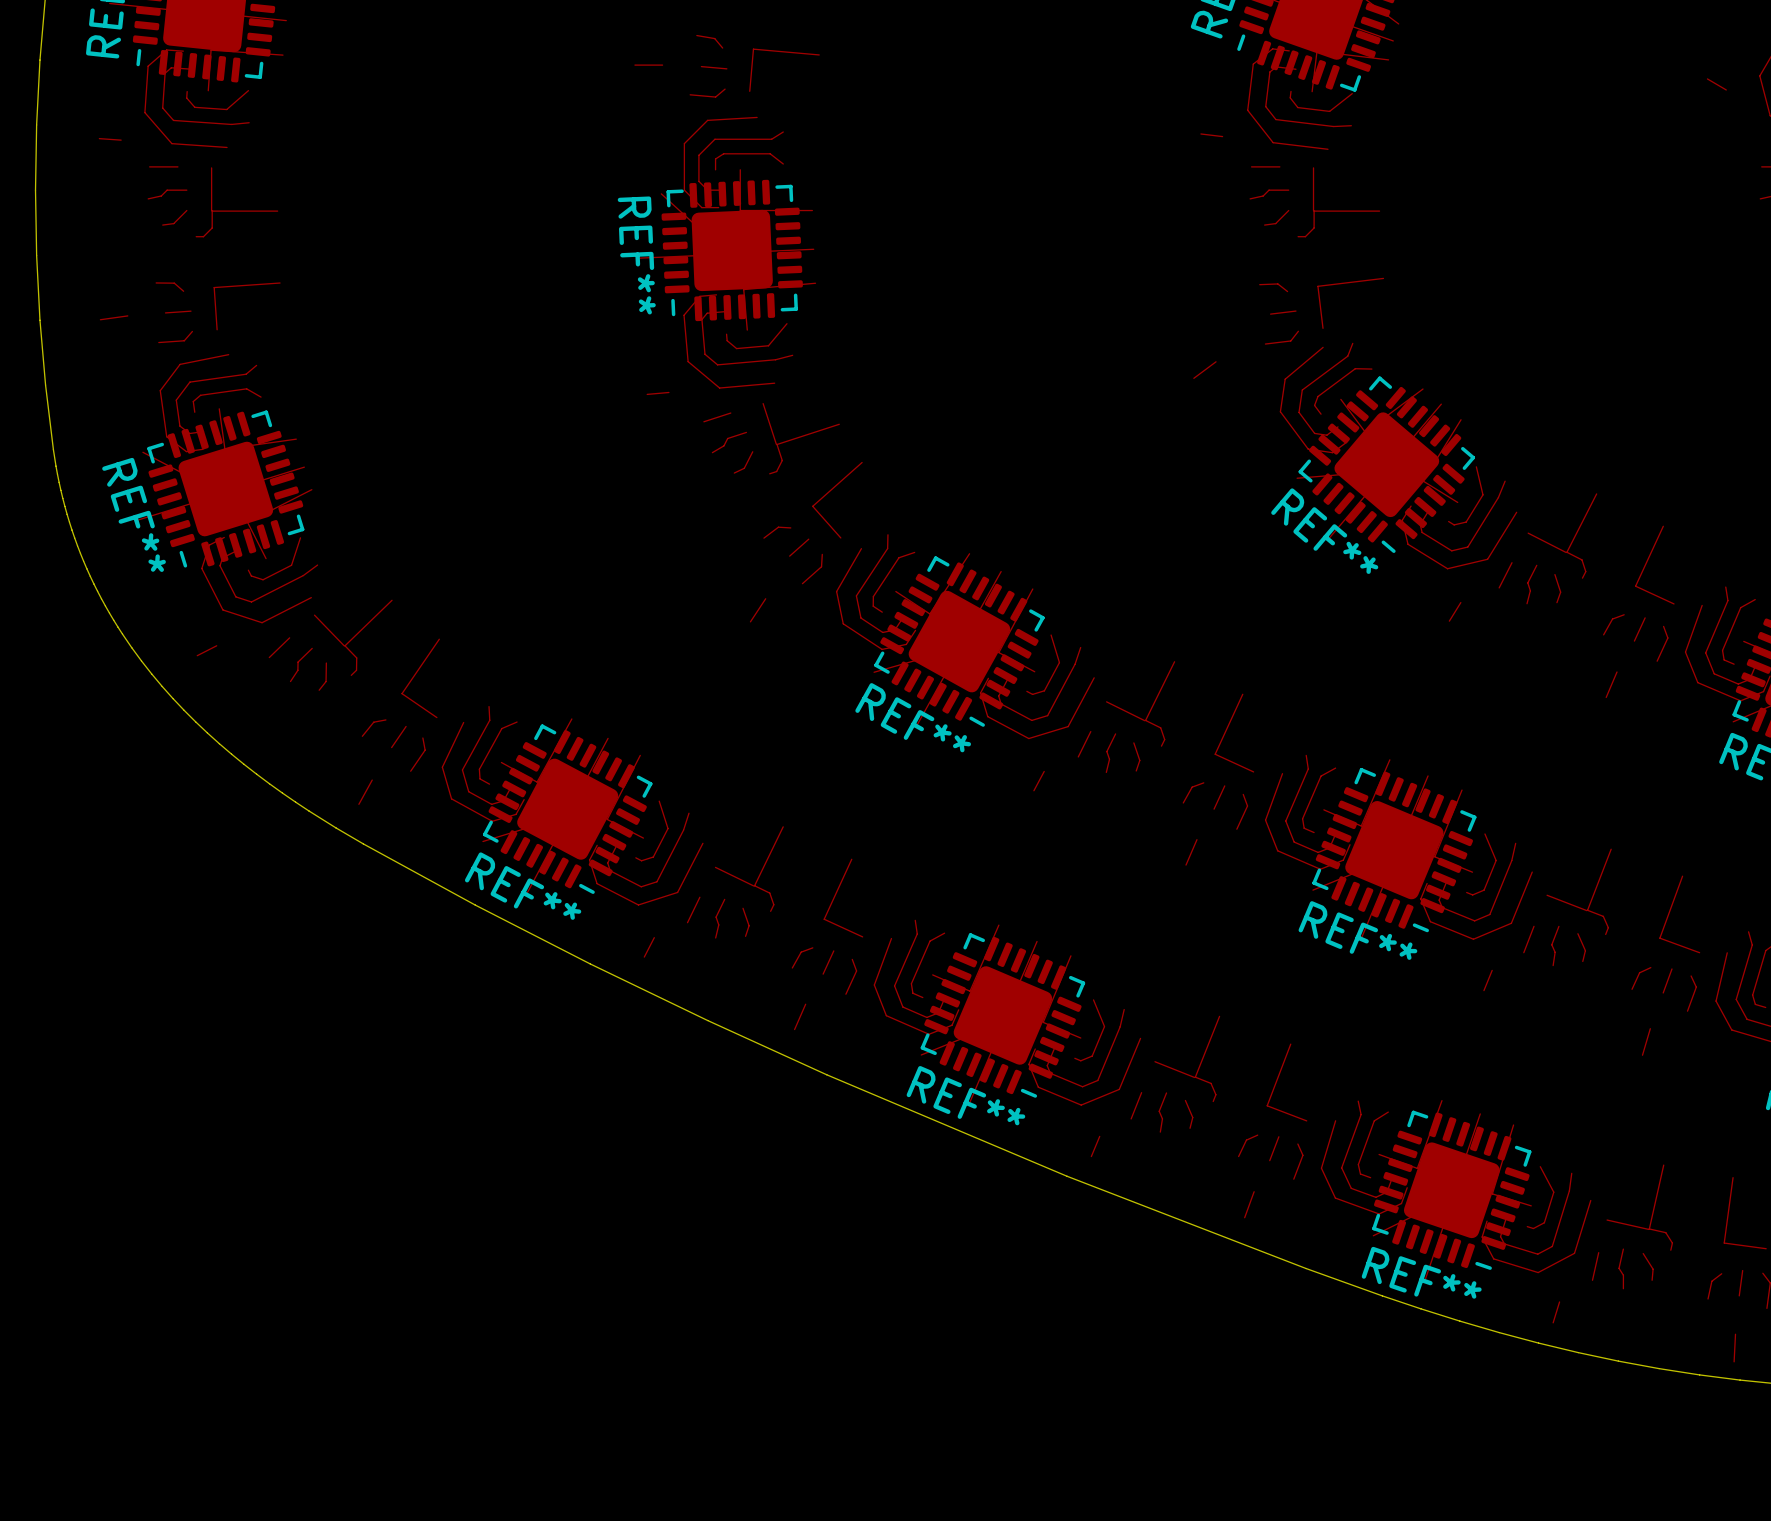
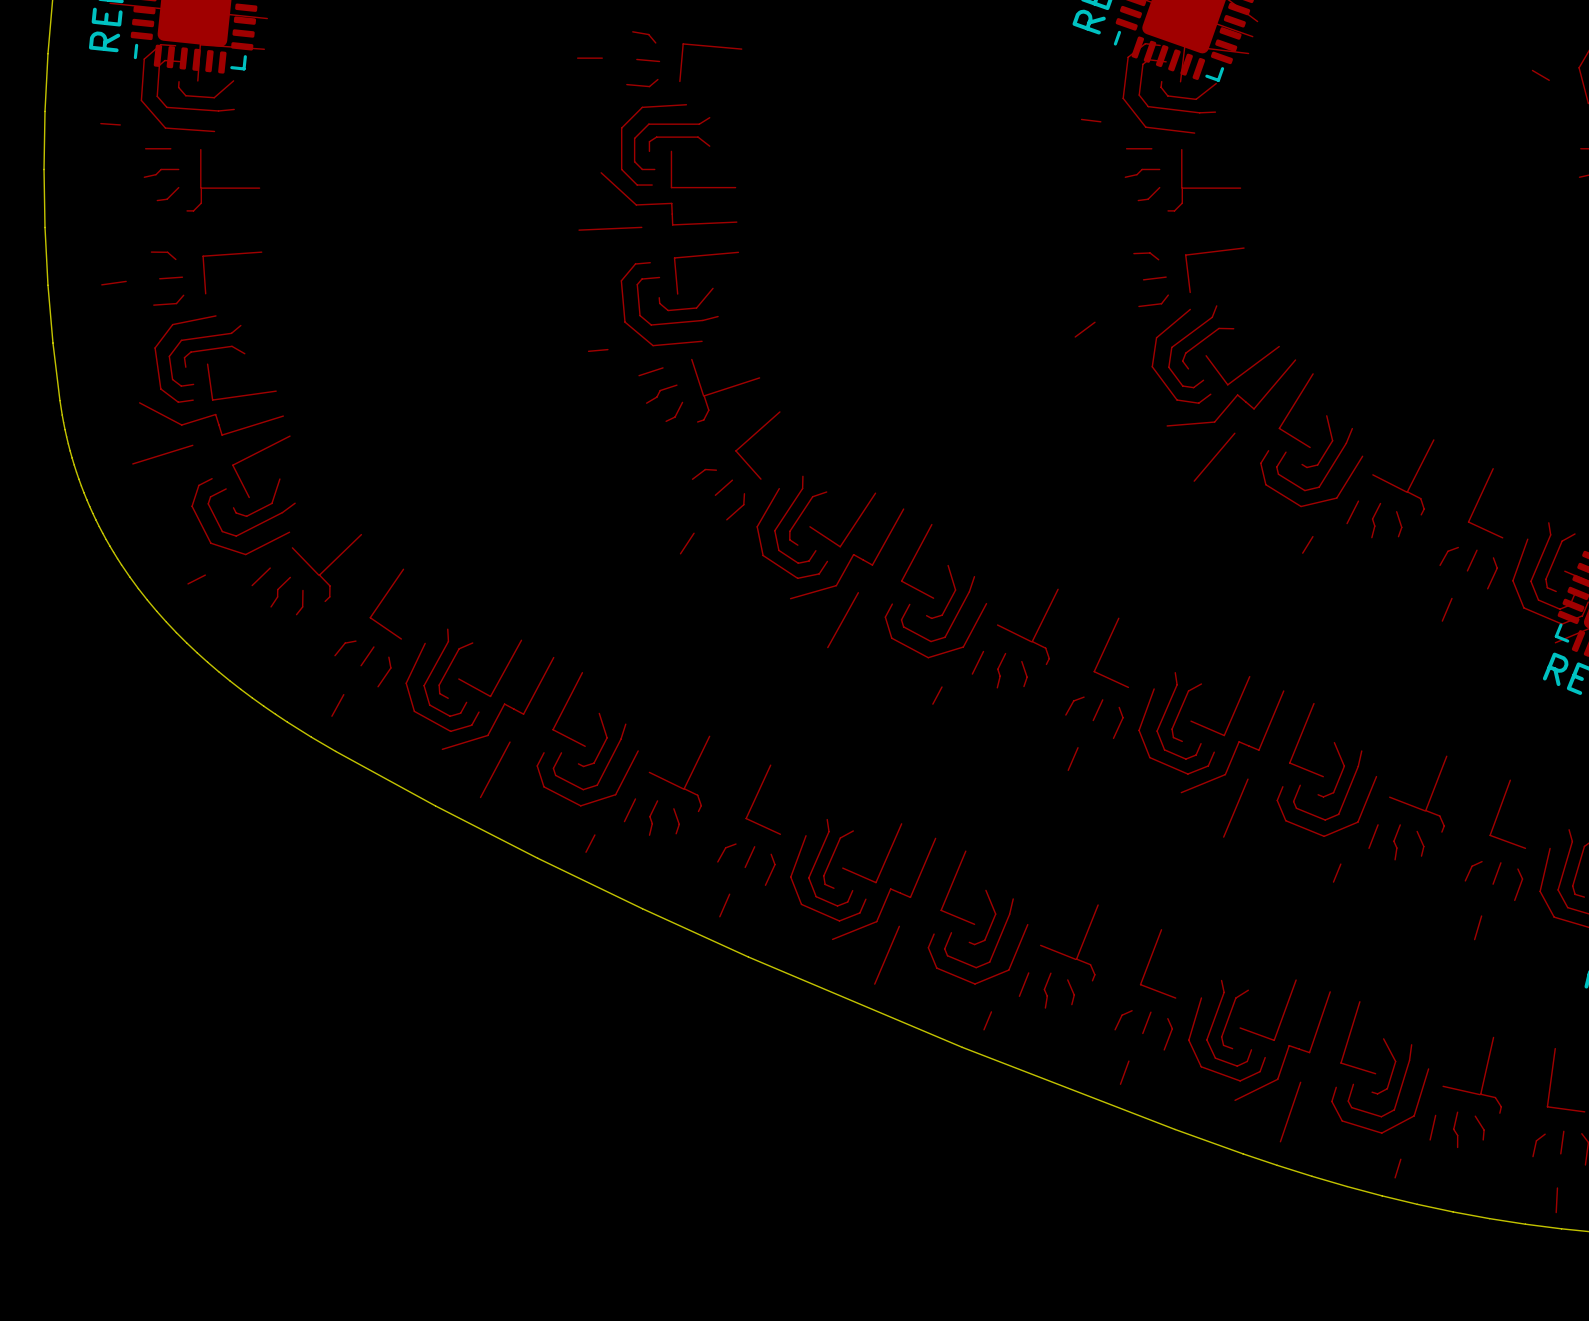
REF**: (732, 250) -> none
REF**: (1386, 464) -> none
REF**: (225, 489) -> none
REF**: (959, 641) -> none
REF**: (567, 809) -> none
REF**: (1394, 850) -> none
REF**: (1002, 1015) -> none
REF**: (1451, 1190) -> none

